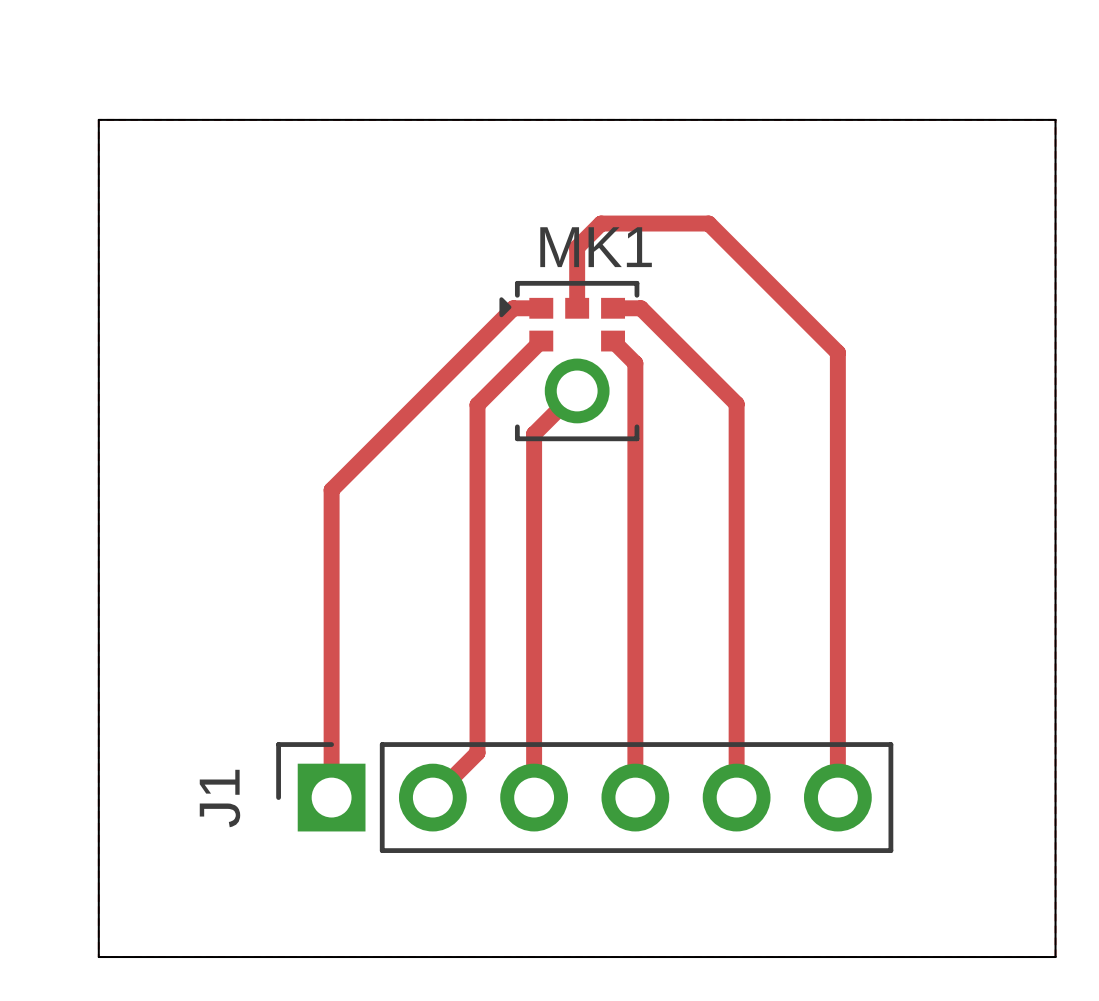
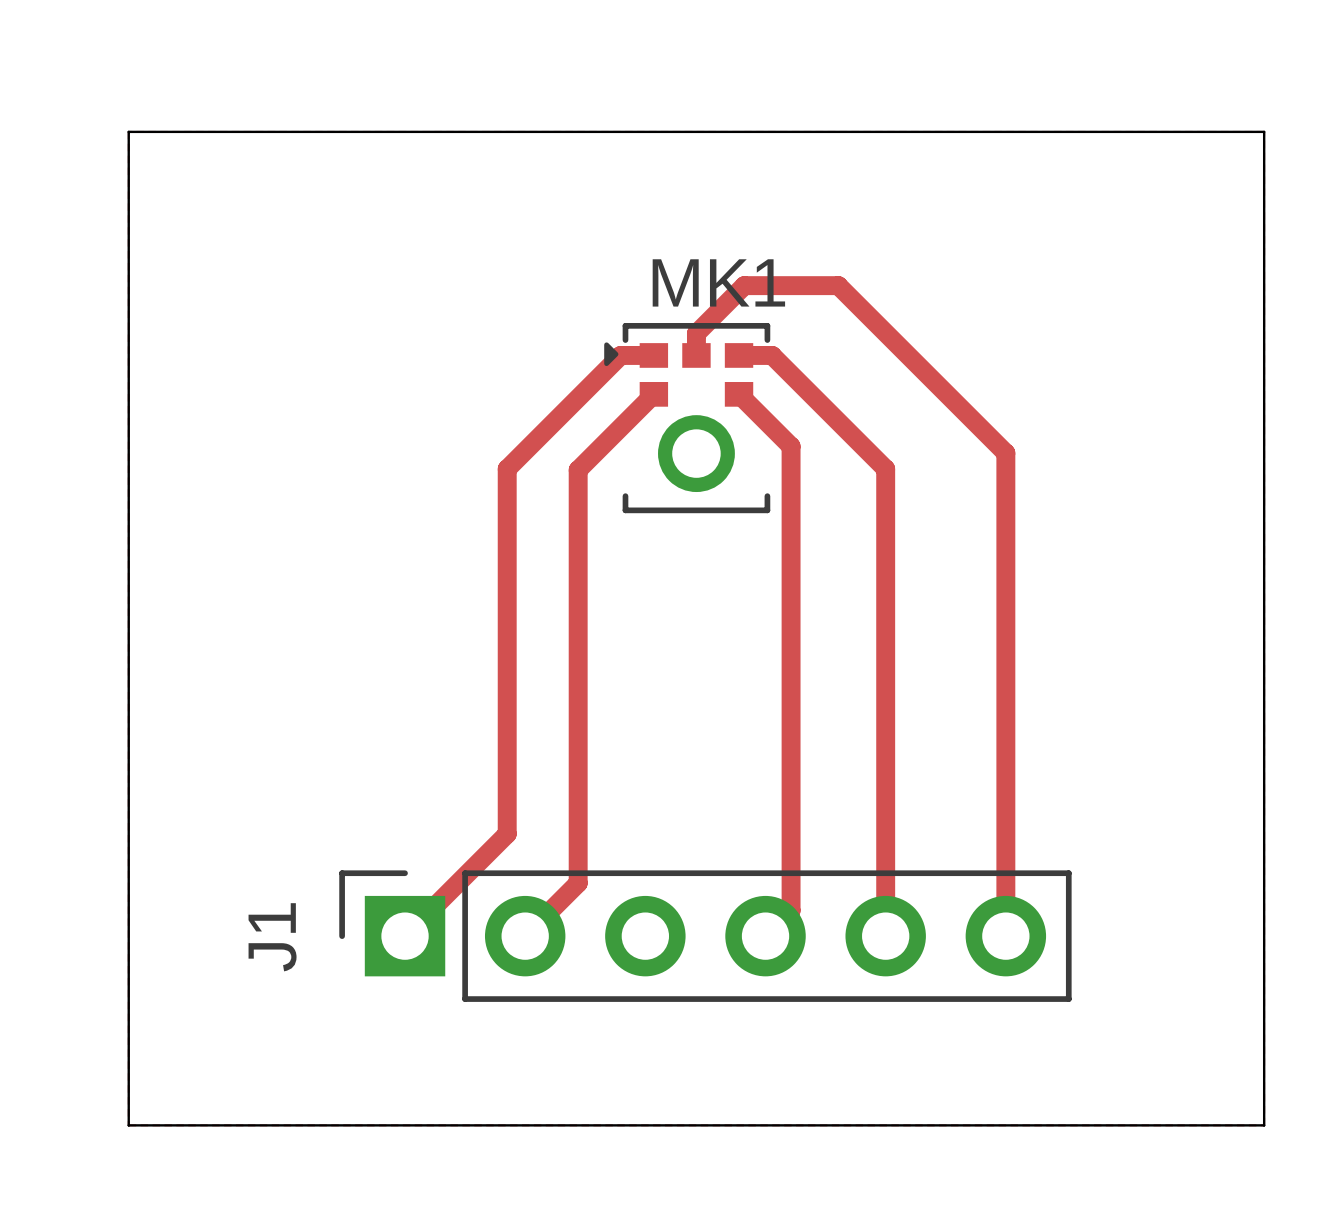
top track: (577, 289) (577, 247) (601, 223) (708, 223) (837, 352) (837, 390) -> (696, 333) (744, 285) (838, 285) (1005, 453)
top track: (635, 363) (635, 797) -> (765, 420) (791, 446) (791, 910) (765, 936)
top track: (577, 390) (534, 434) (534, 797) -> none
top track: (417, 403) (331, 490) (331, 797) -> (507, 469) (507, 833) (405, 936)

